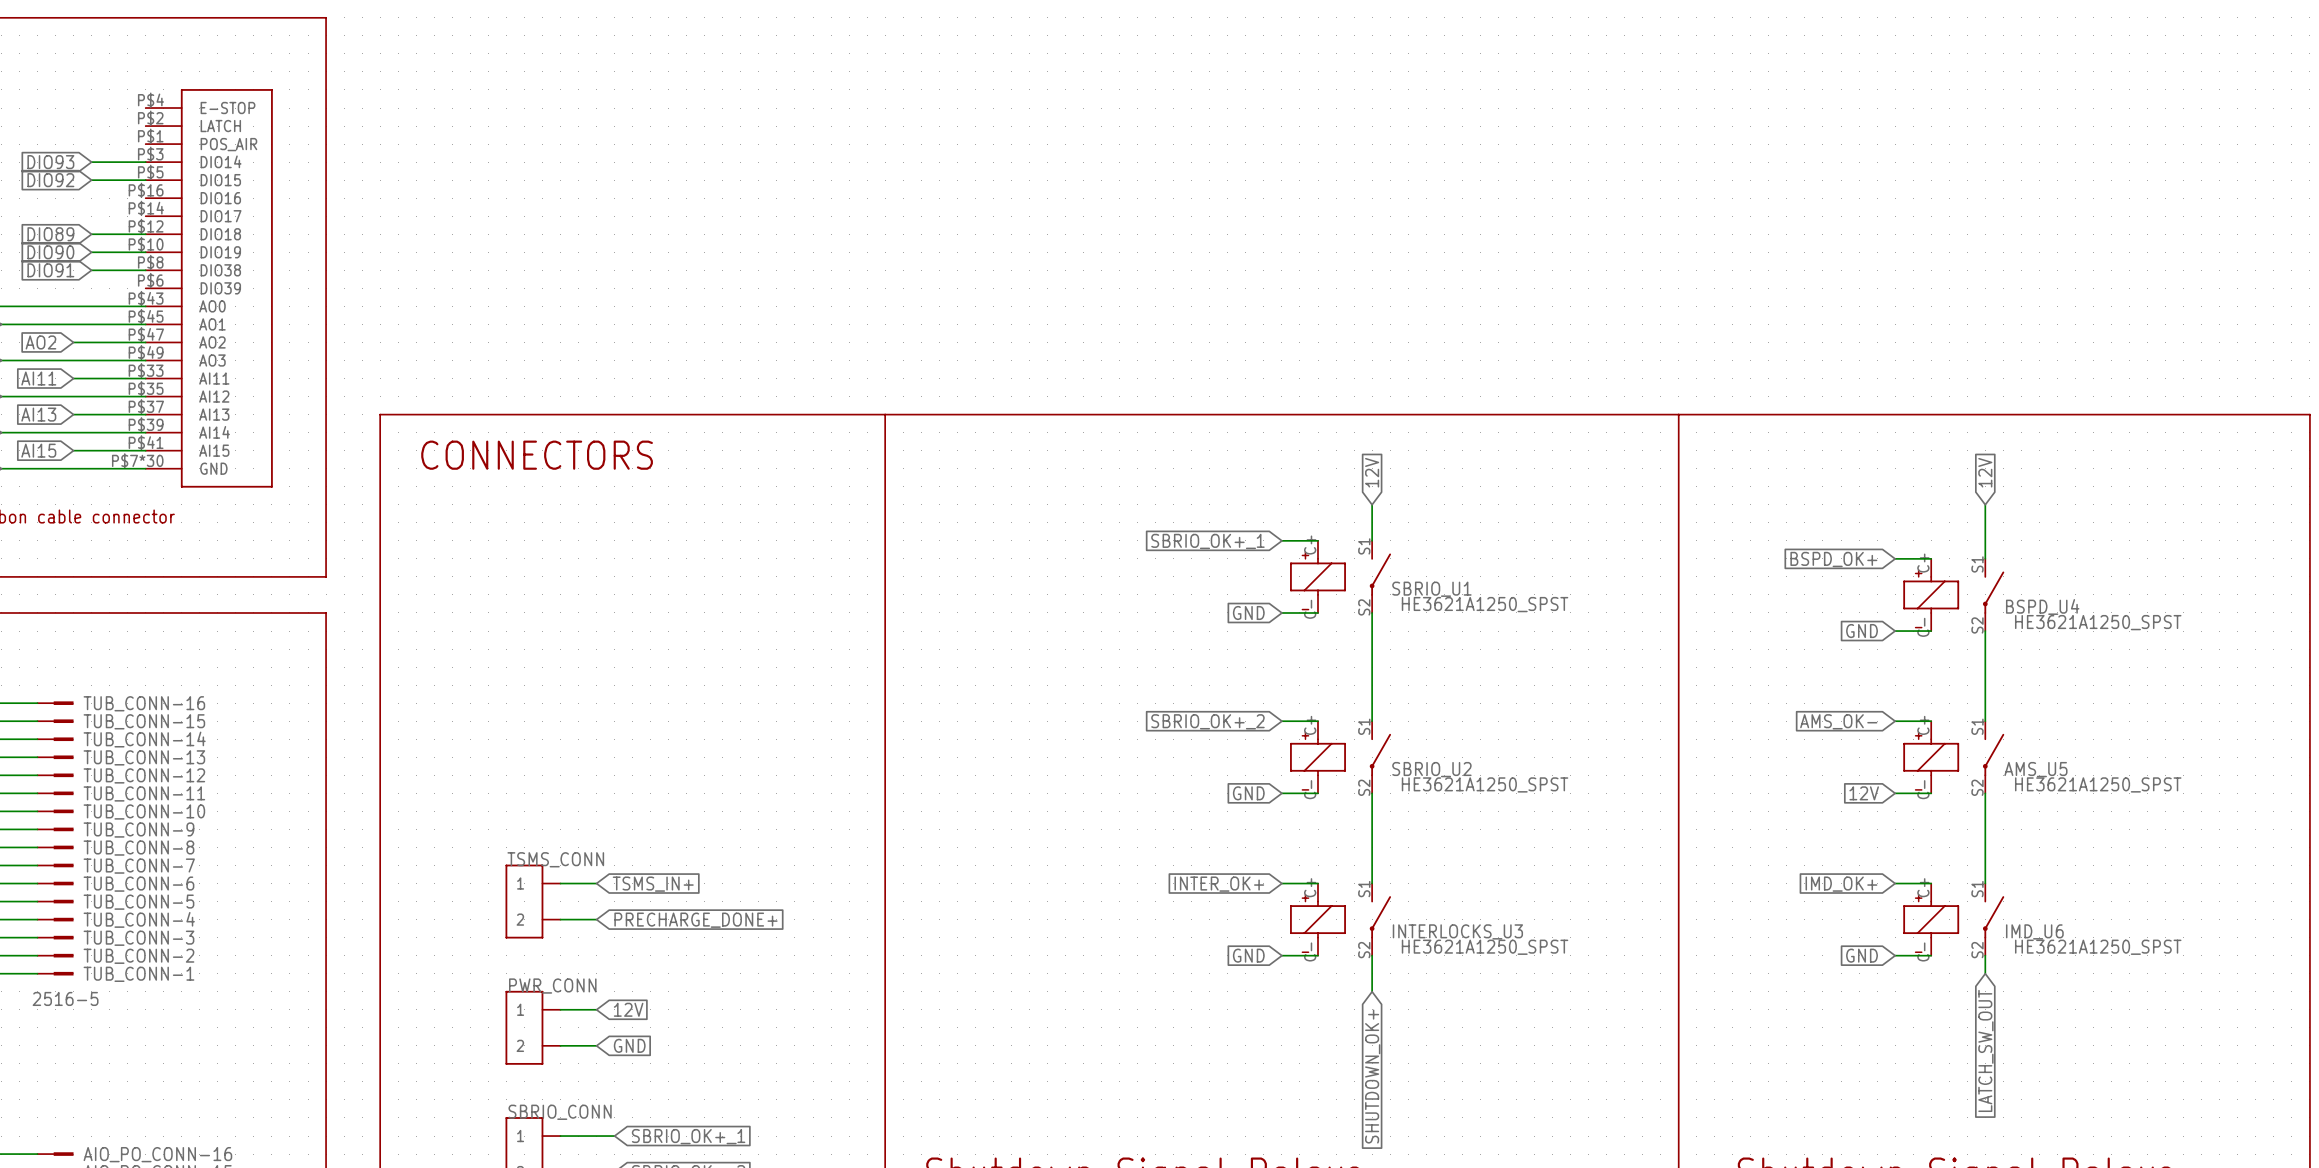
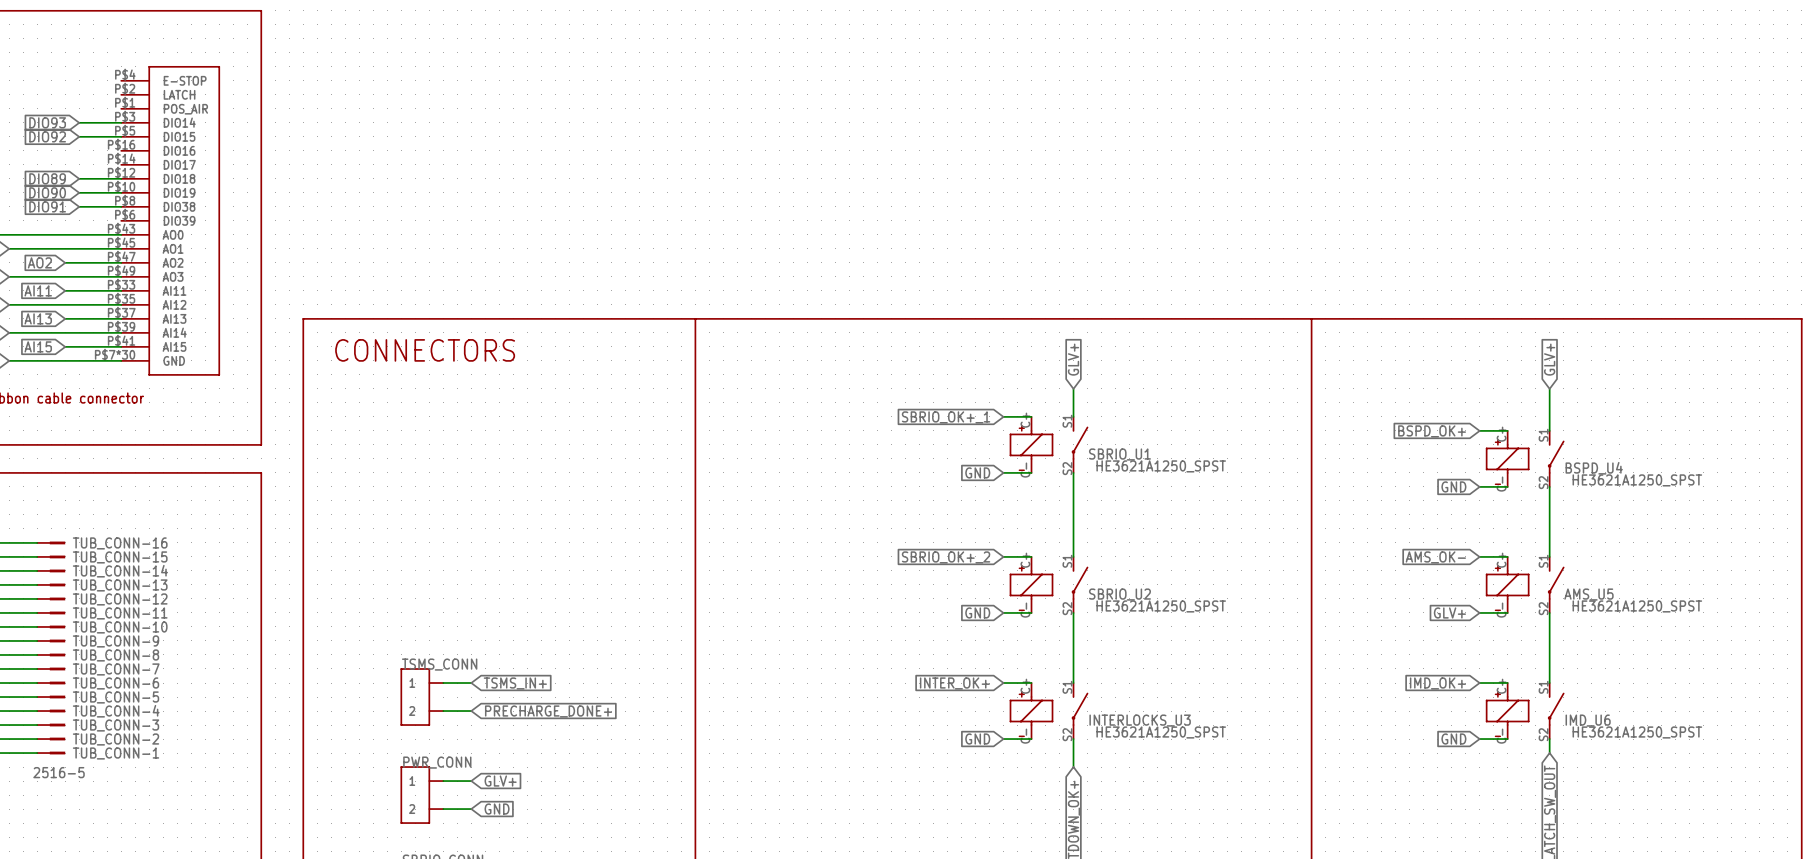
global label: 12V (1372, 472) -> GLV+ (1073, 359)
global label: 12V (1985, 472) -> GLV+ (1549, 359)
global label: 12V (1864, 793) -> GLV+ (1449, 612)
global label: 12V (628, 1009) -> GLV+ (500, 781)

